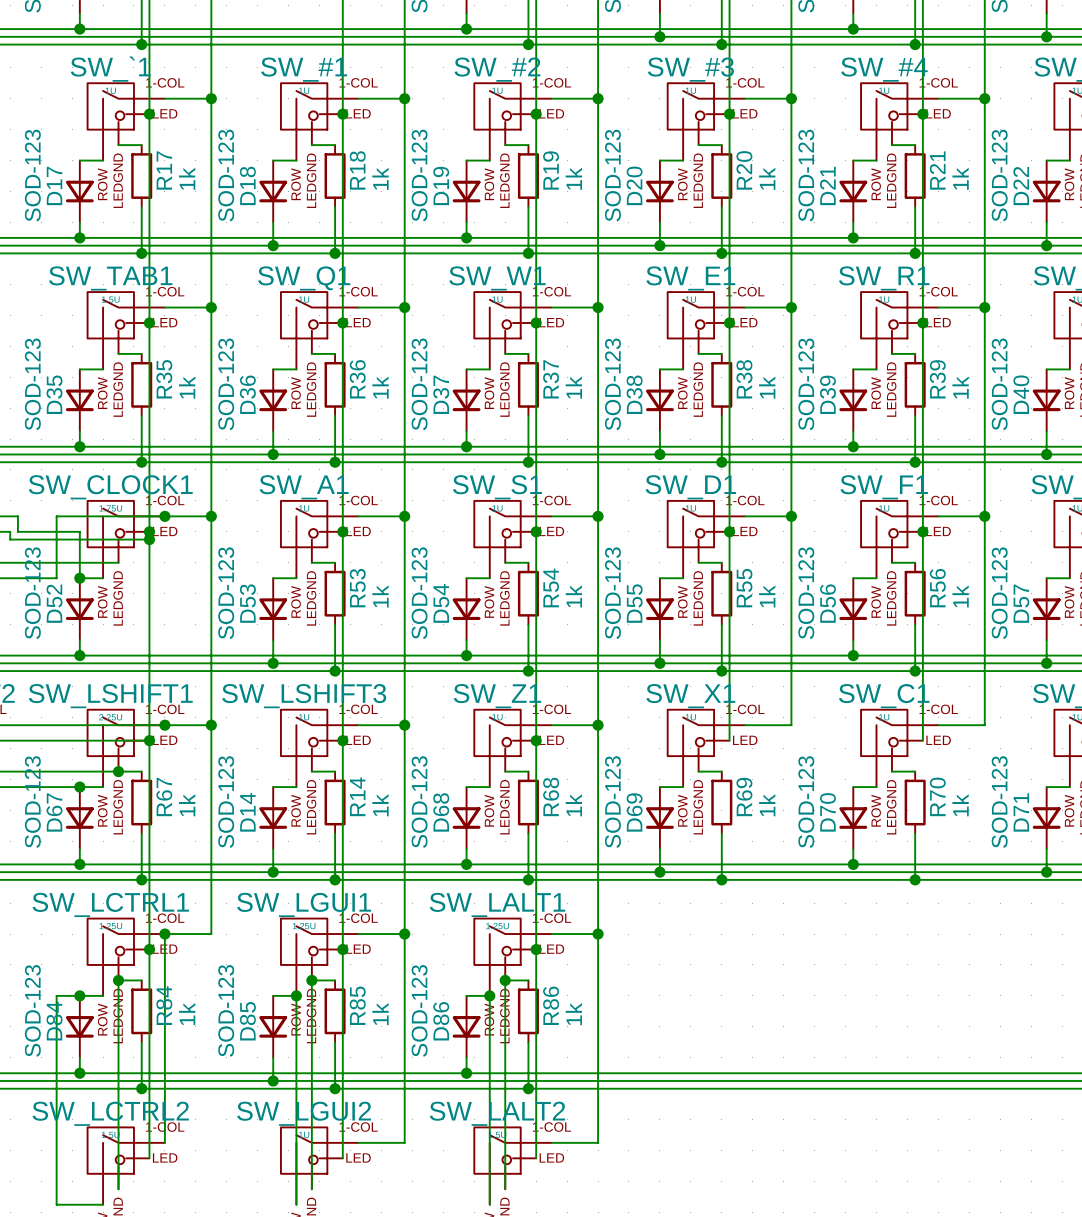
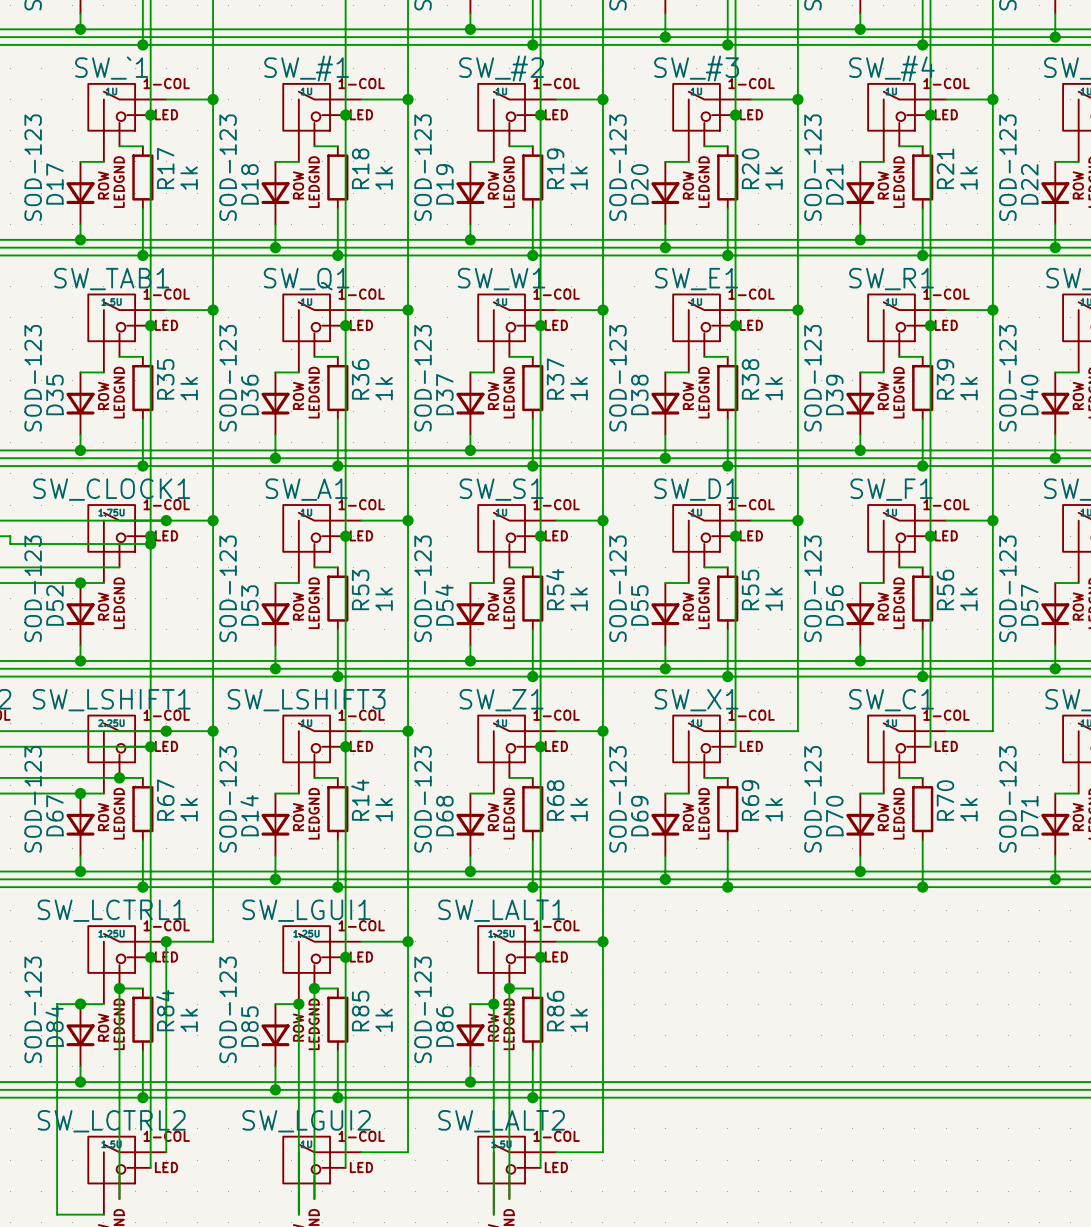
wire: (17, 516) (17, 531) (79, 531) (79, 578) -> (18, 520) (57, 520)
wire: (56, 516) (56, 578) -> (80, 582) (57, 582)

